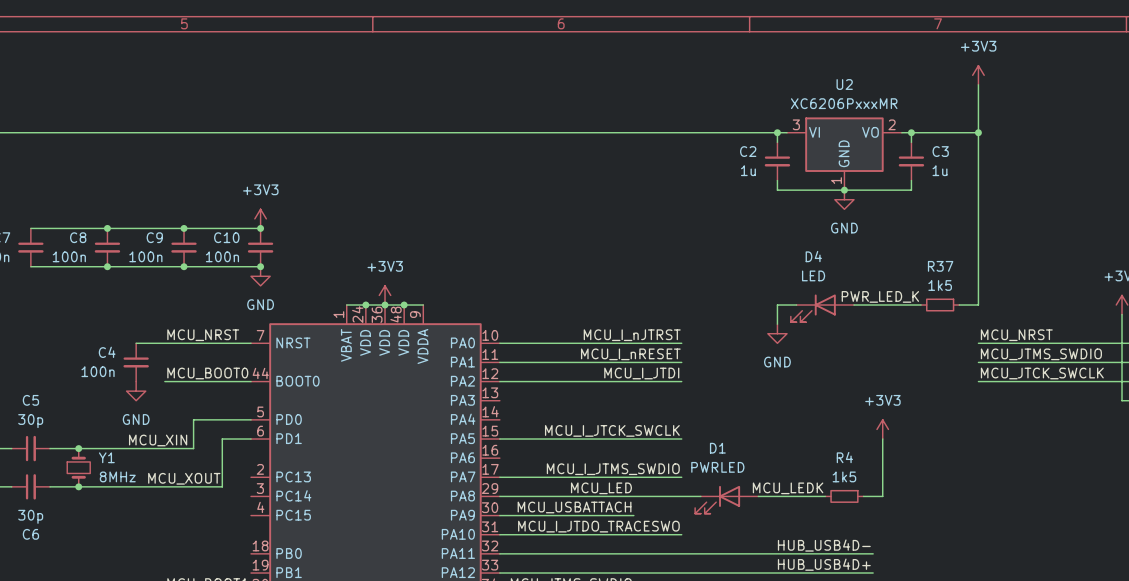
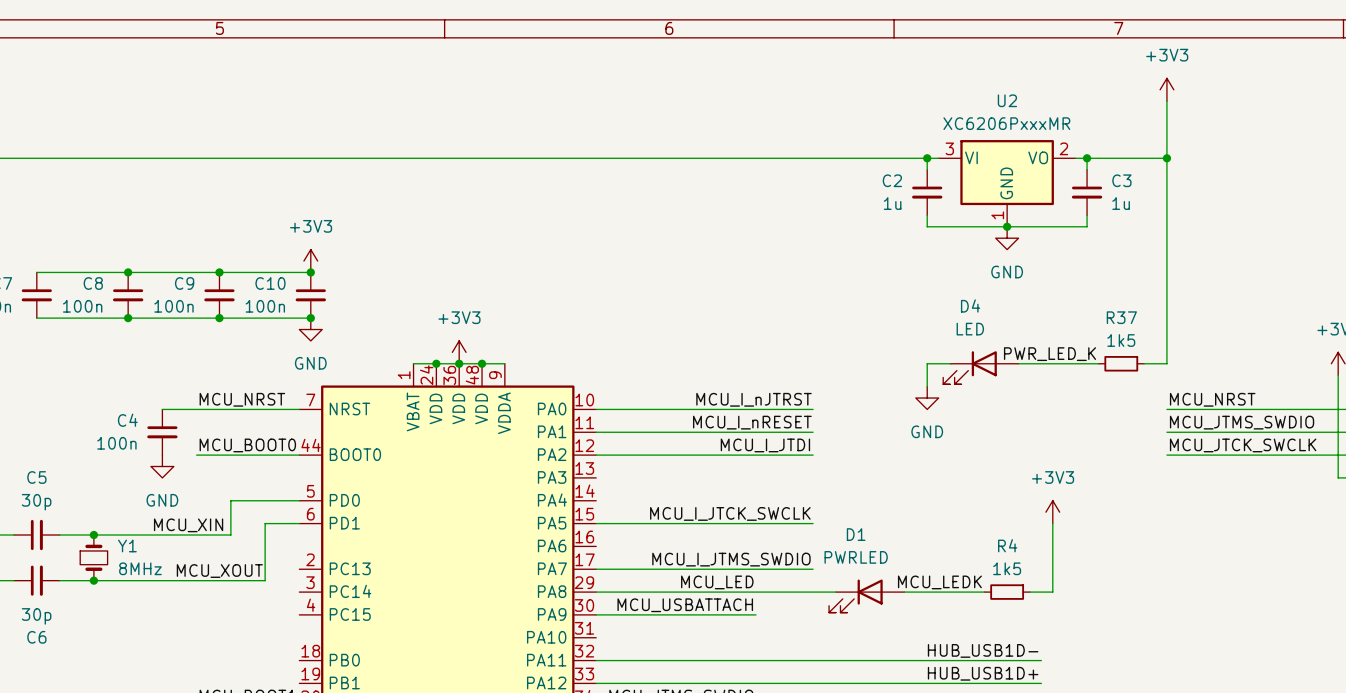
label: MCU_I_JTDO_TRACESWO (598, 526) -> none
wire: (499, 534) (681, 534) -> none
label: HUB_USB4D- (824, 545) -> HUB_USB1D- (983, 650)
label: HUB_USB4D+ (824, 564) -> HUB_USB1D+ (983, 673)

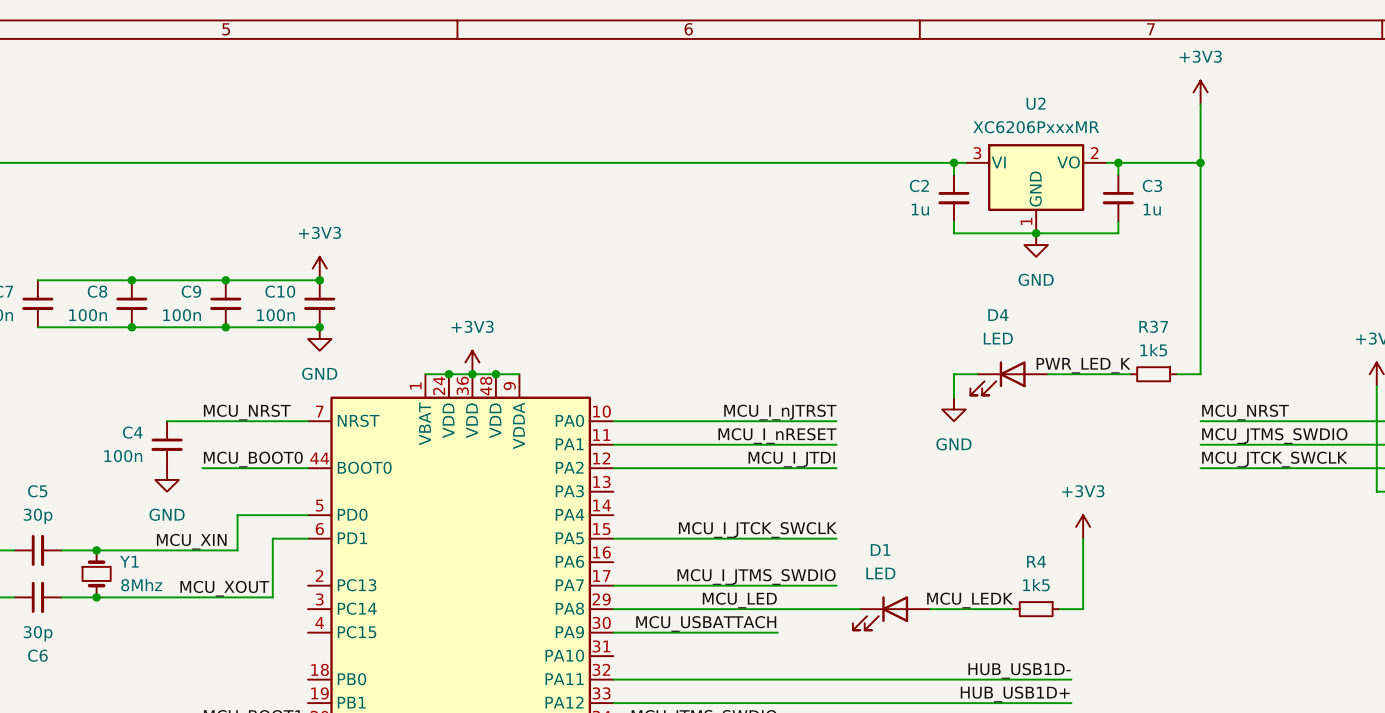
D1 value: PWRLED (856, 557) -> LED (880, 573)
Y1 value: 8MHz (140, 568) -> 8Mhz (141, 585)

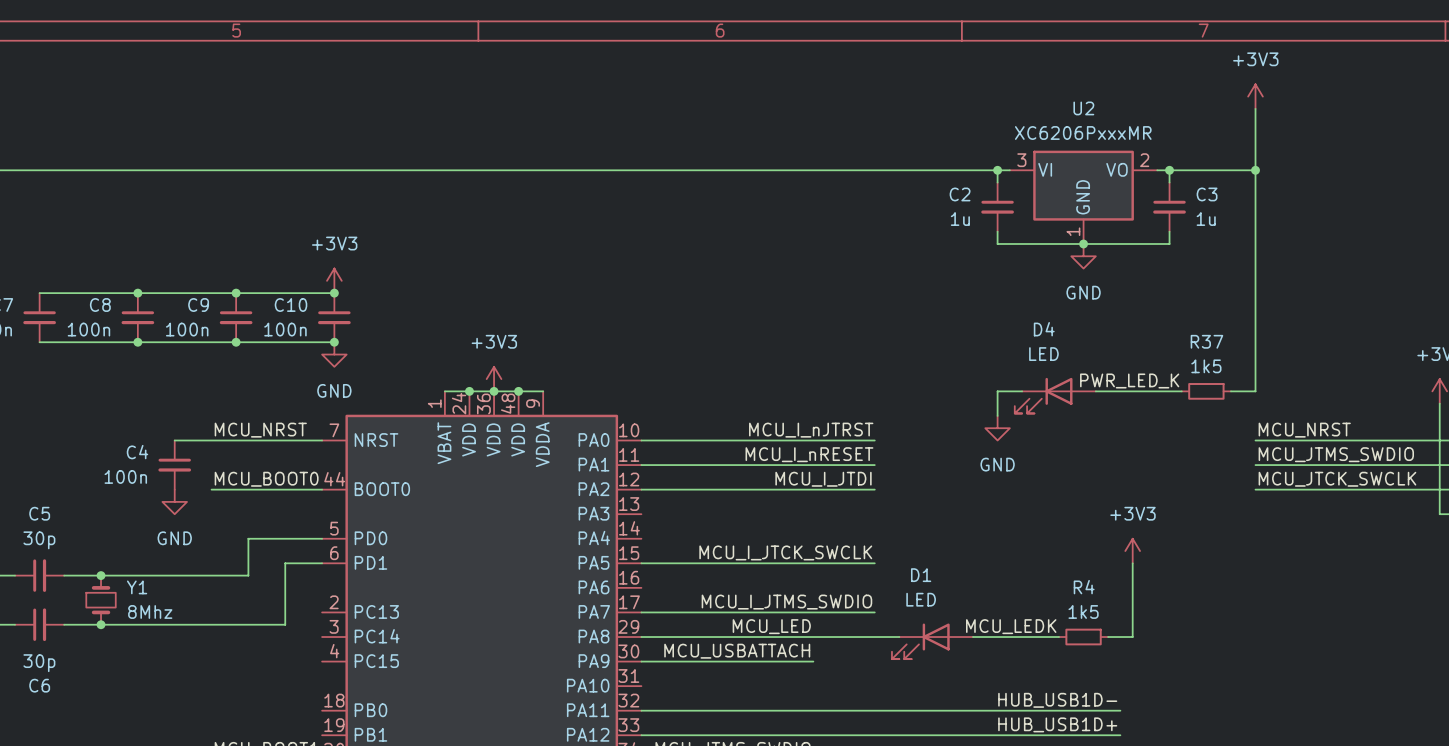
label: MCU_XIN (191, 541) -> none
label: MCU_XOUT (224, 588) -> none

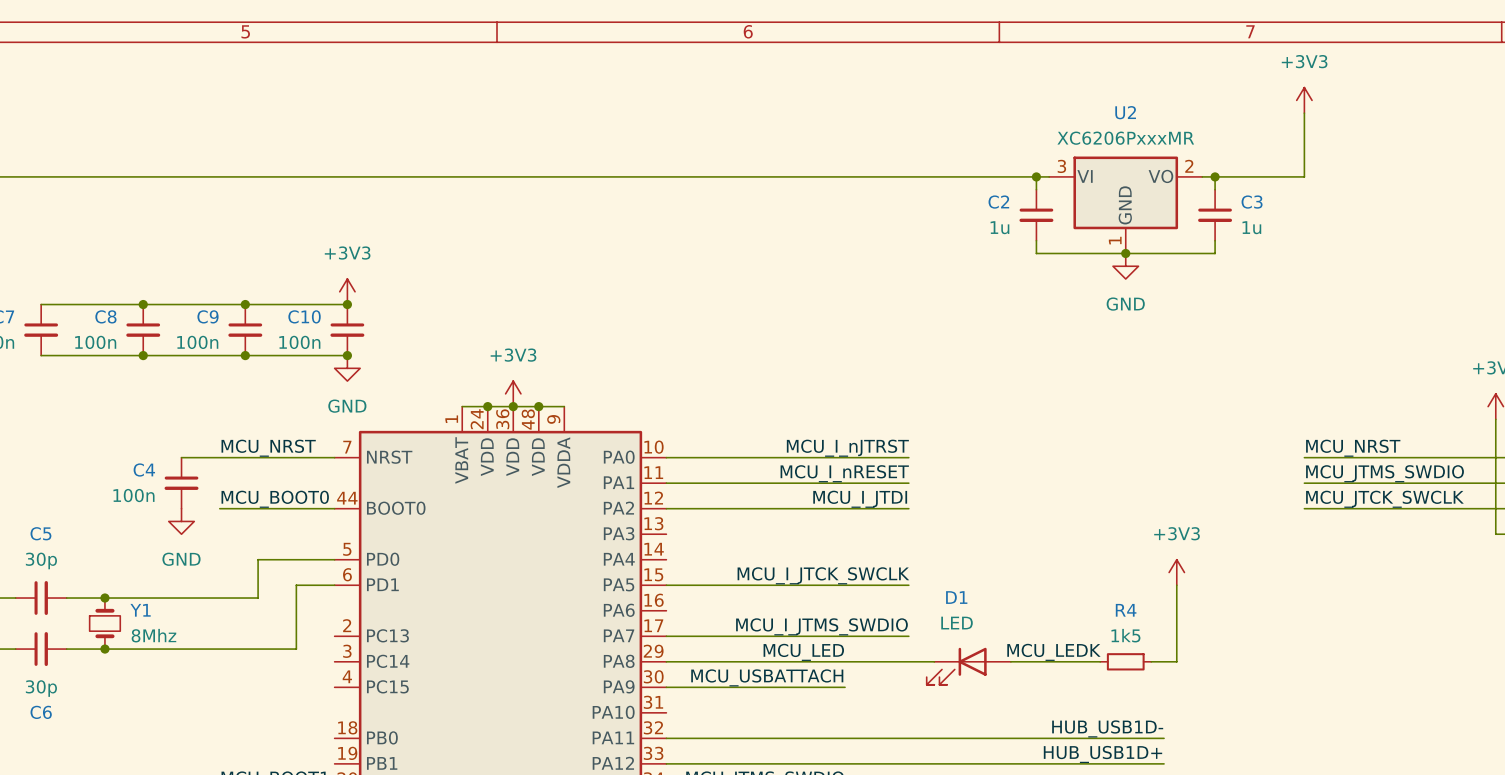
wire: (1255, 170) (1255, 391) (1230, 391) -> none
junction: (1255, 170) -> none
label: PWR_LED_K (1129, 381) -> none
wire: (1022, 391) (997, 391) (997, 415) -> none
wire: (1095, 391) (1181, 391) -> none
R37: 1k5 (1206, 391) -> none
D4: LED (1055, 395) -> none
power symbol: GND (997, 428) -> none

